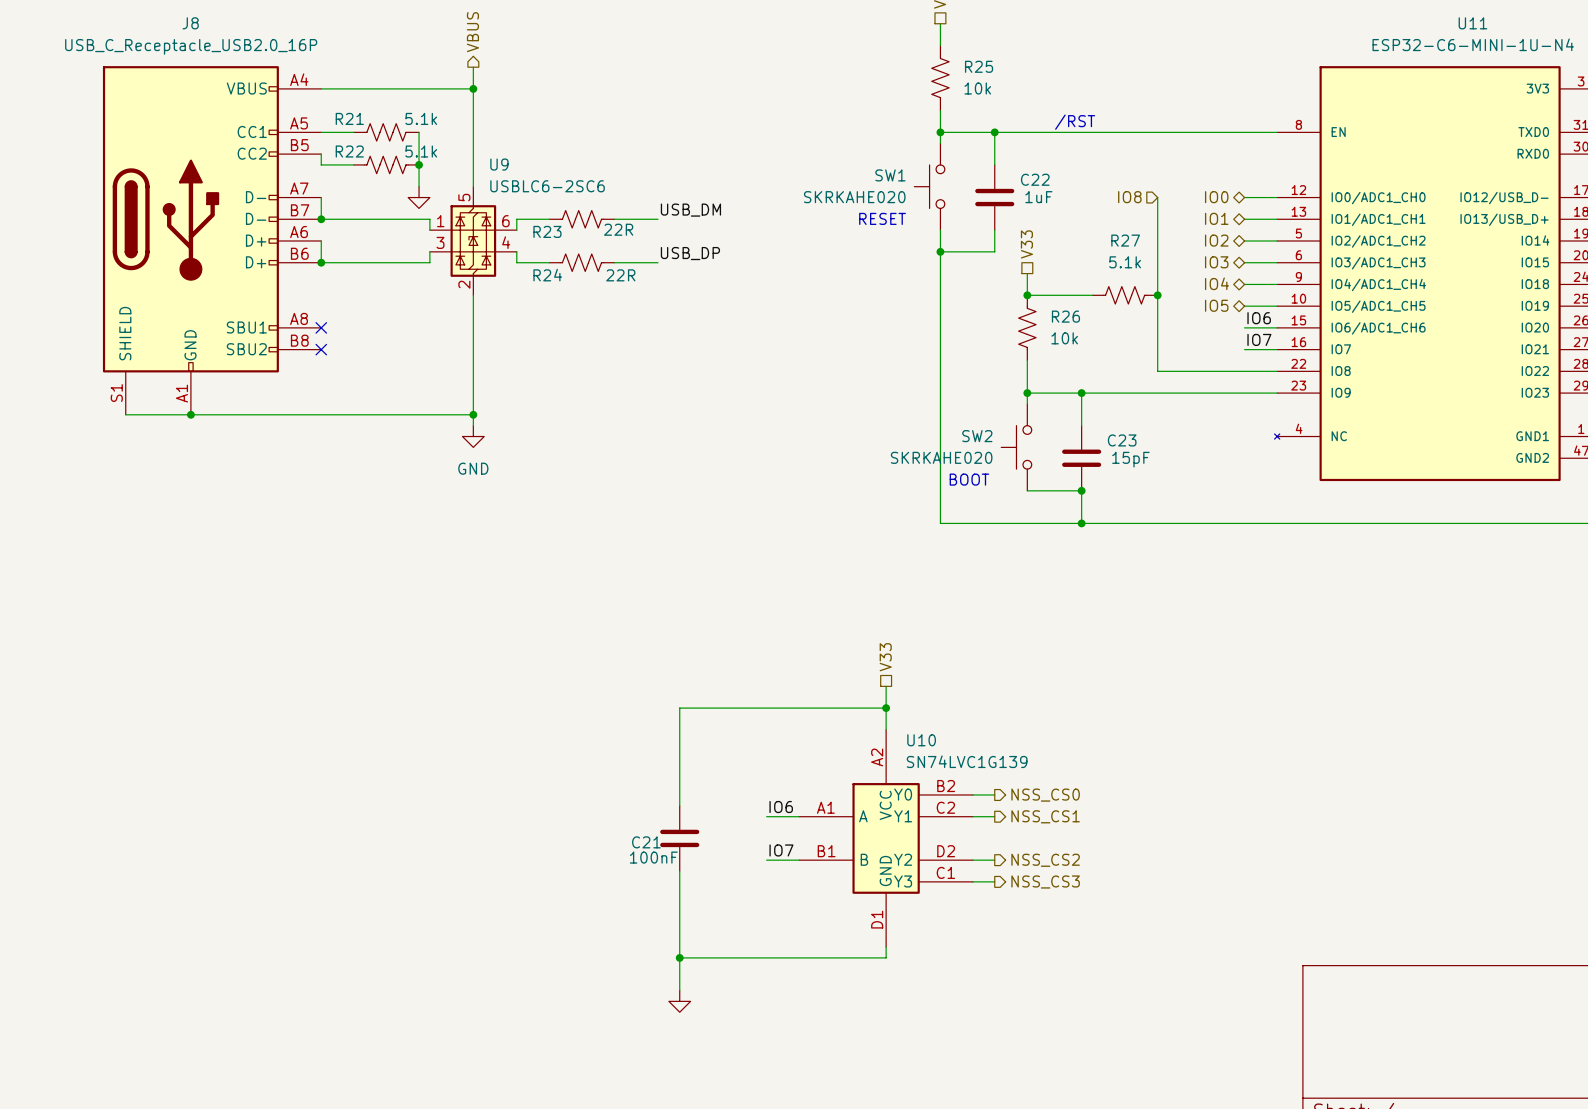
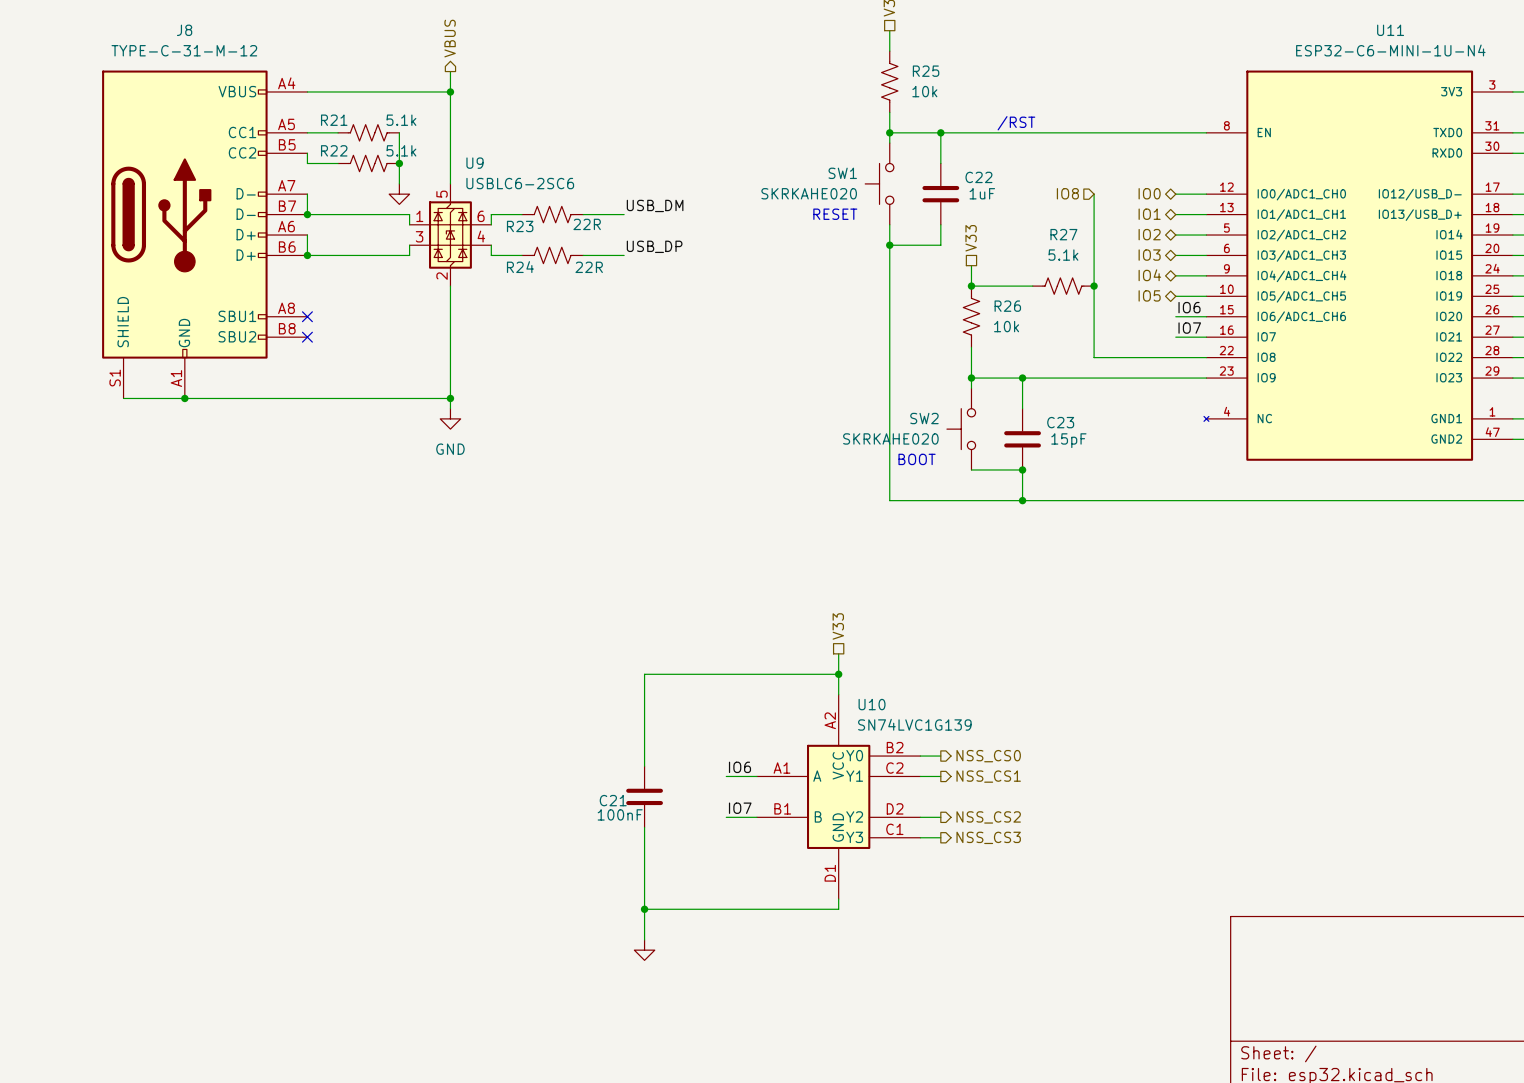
J8 value: USB_C_Receptacle_USB2.0_16P (191, 46) -> TYPE-C-31-M-12 (184, 50)

